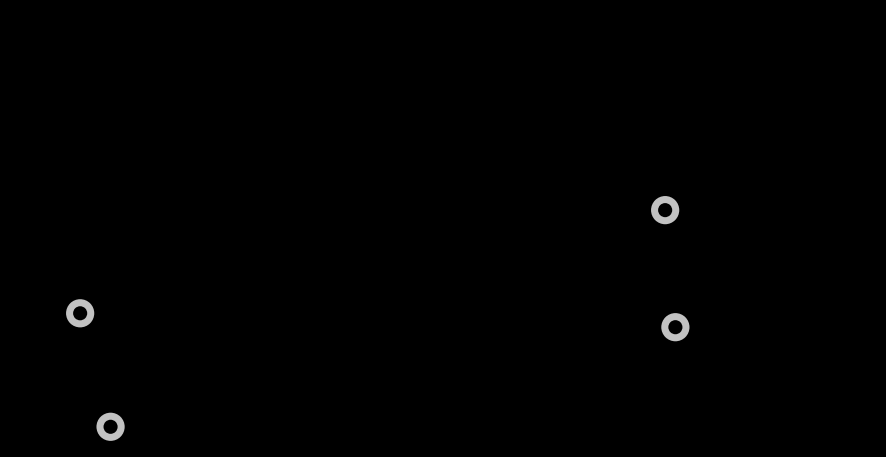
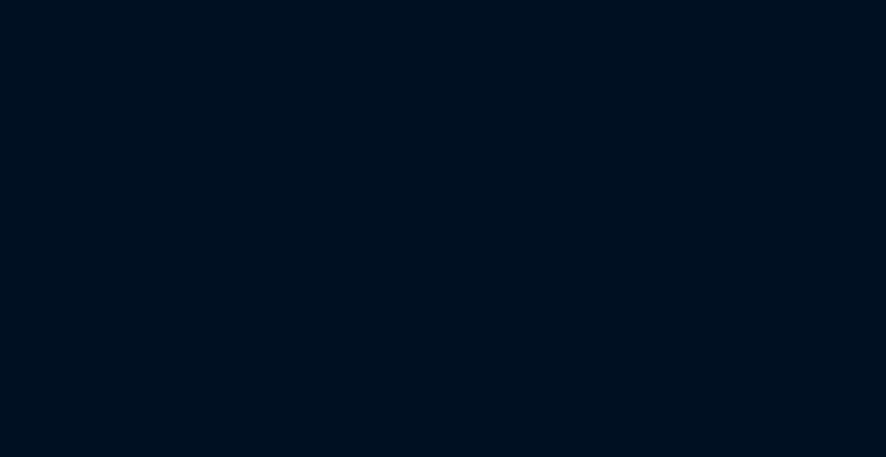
via: (665, 210) -> none
via: (80, 313) -> none
via: (675, 327) -> none
via: (110, 426) -> none

